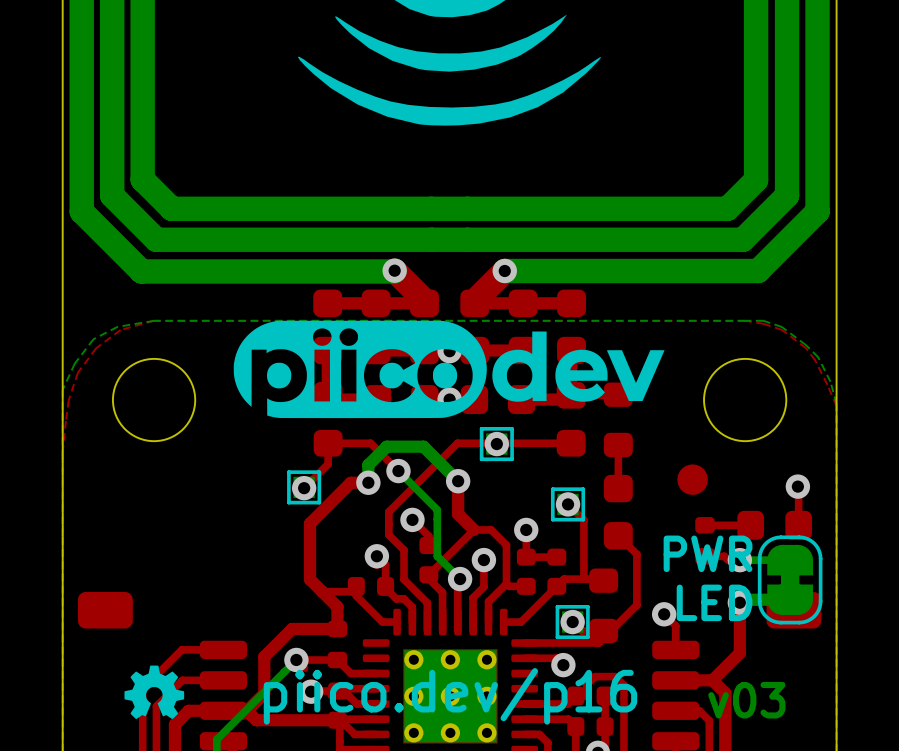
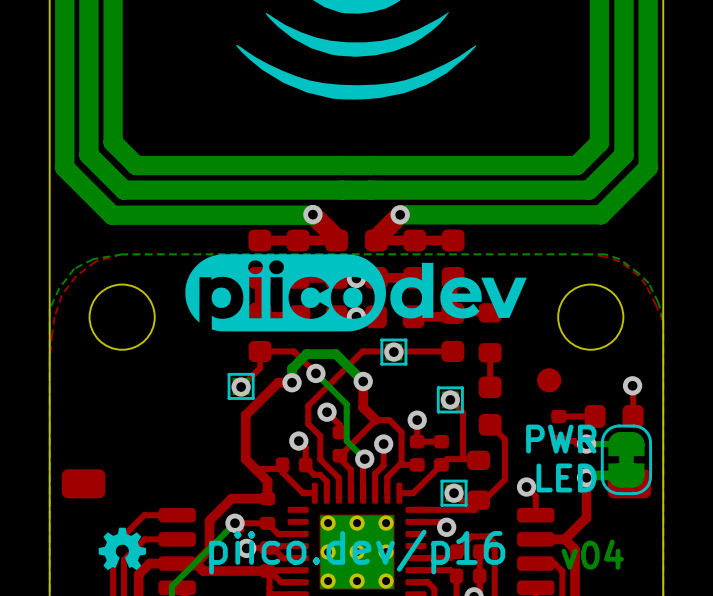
text: v03 (746, 700) -> v04 (592, 554)

